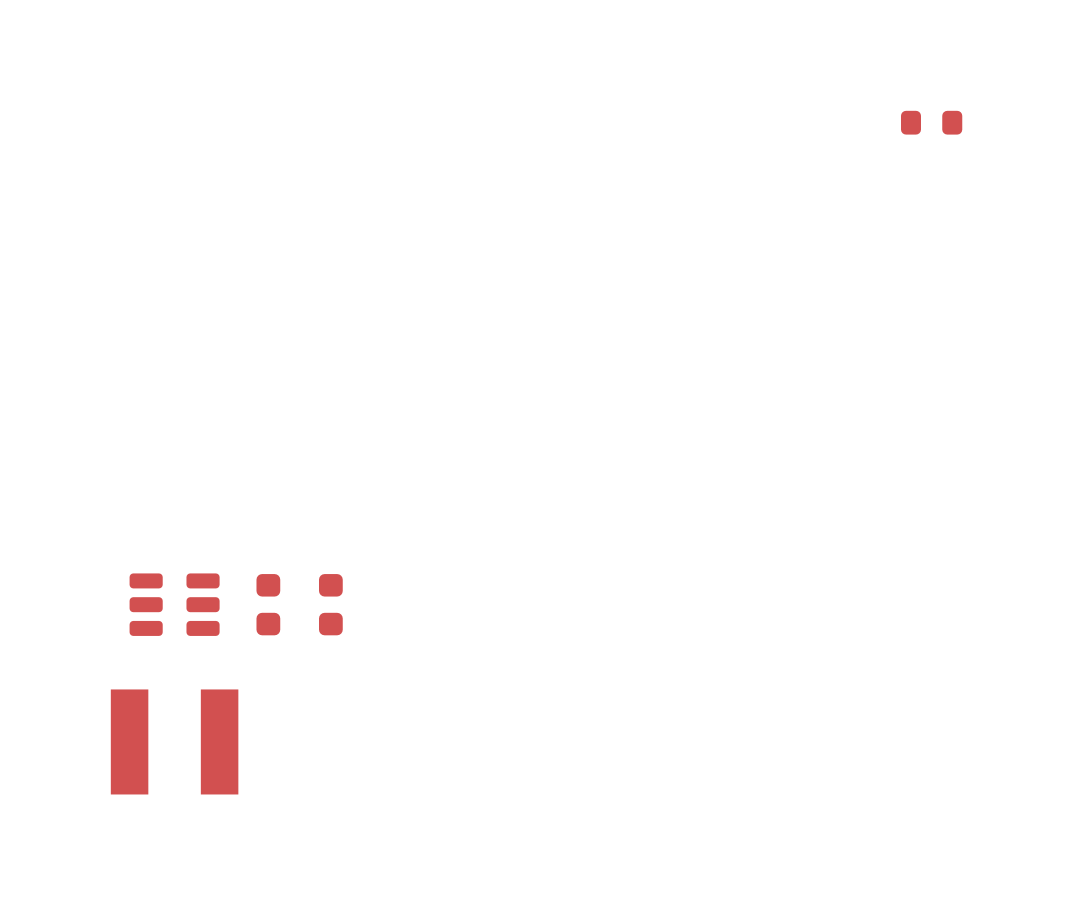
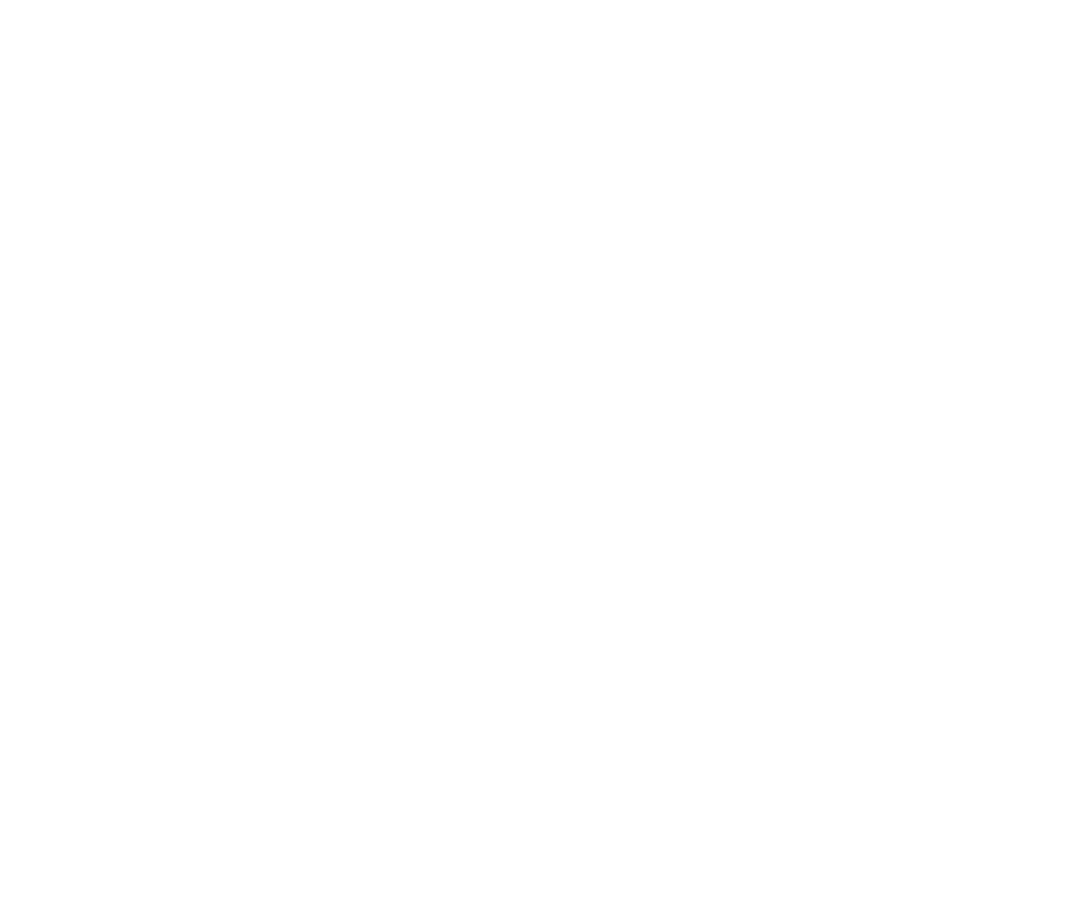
part: (931, 122) -> none
part: (174, 604) -> none
part: (268, 604) -> none
part: (330, 604) -> none
part: (174, 741) -> none

